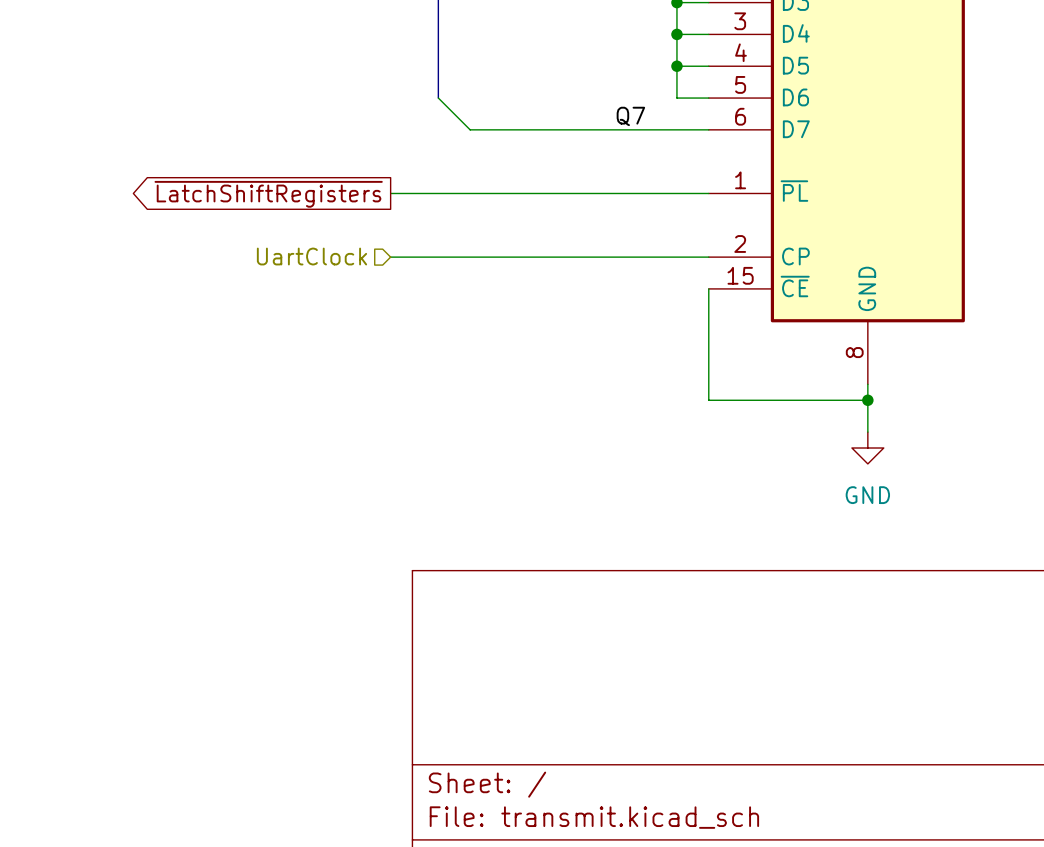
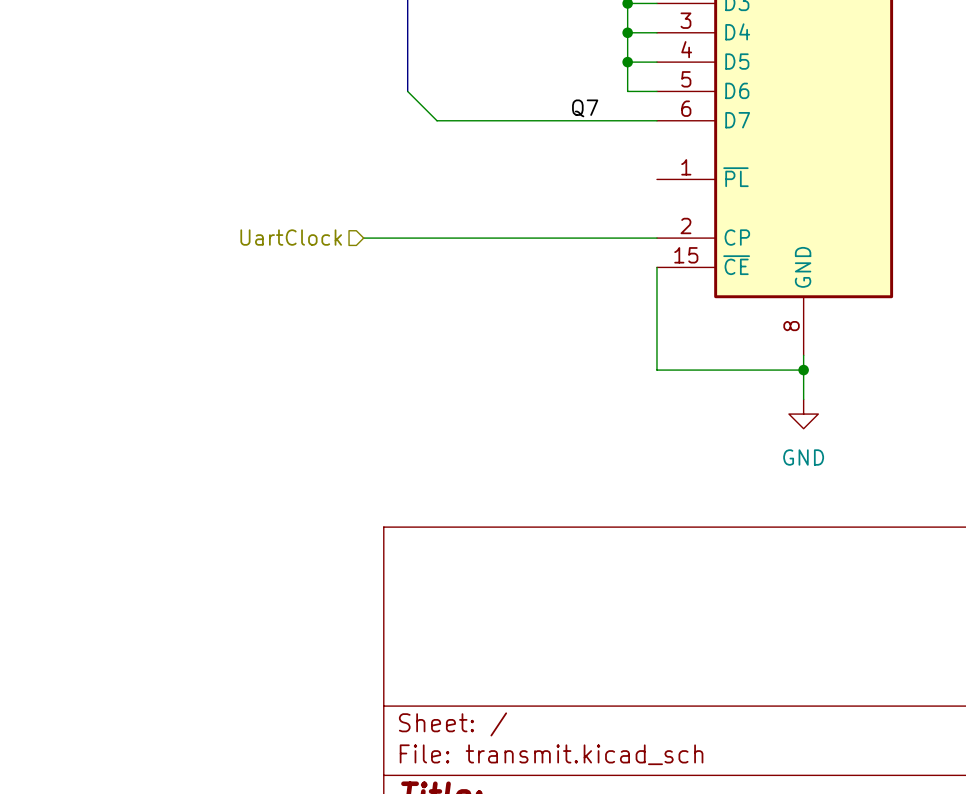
wire: (390, 193) (708, 193) -> none
global label: ~{LatchShiftRegisters} (268, 194) -> none

